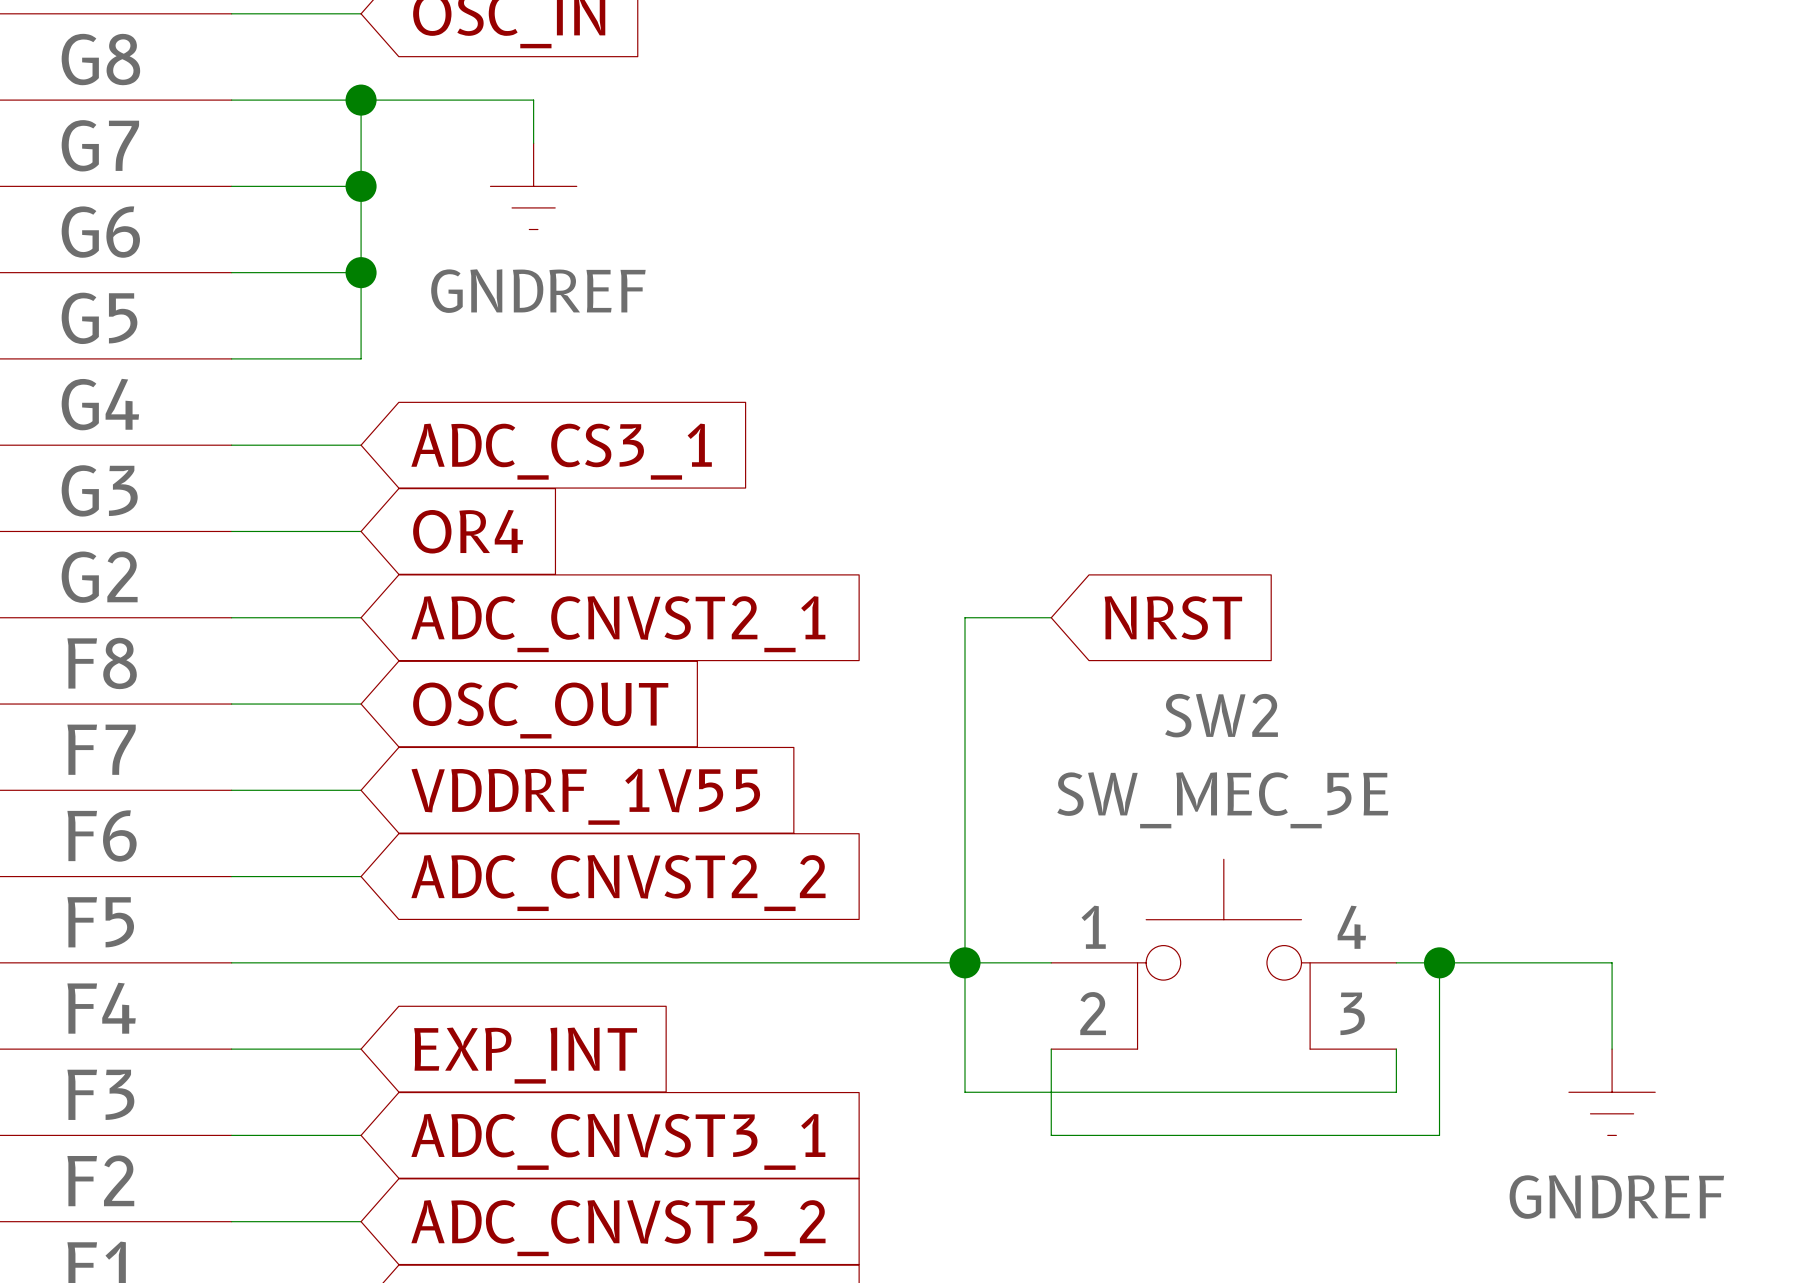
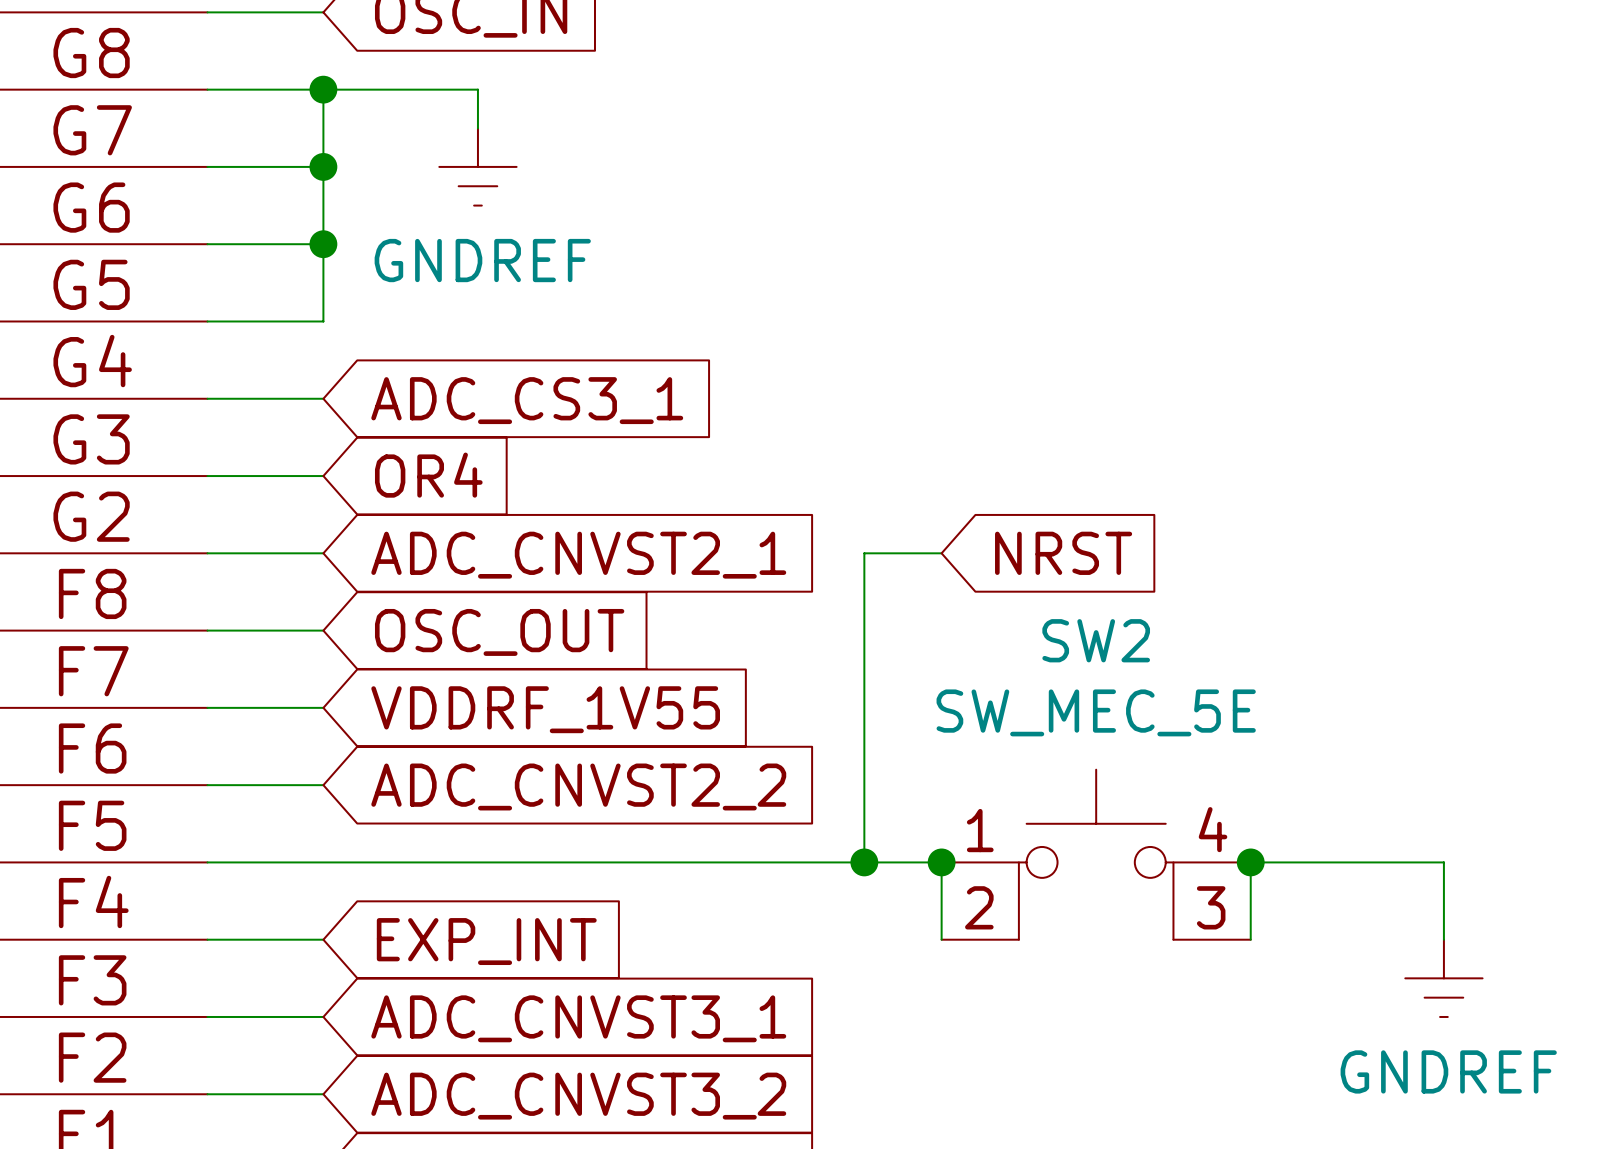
wire: (964, 962) (964, 1092) (1396, 1092) (1396, 1049) -> (1250, 862) (1250, 939)
junction: none -> (941, 862)
wire: (1439, 962) (1439, 1135) (1051, 1135) (1051, 1049) -> (941, 862) (941, 939)
junction position: (1439, 962) -> (1250, 862)

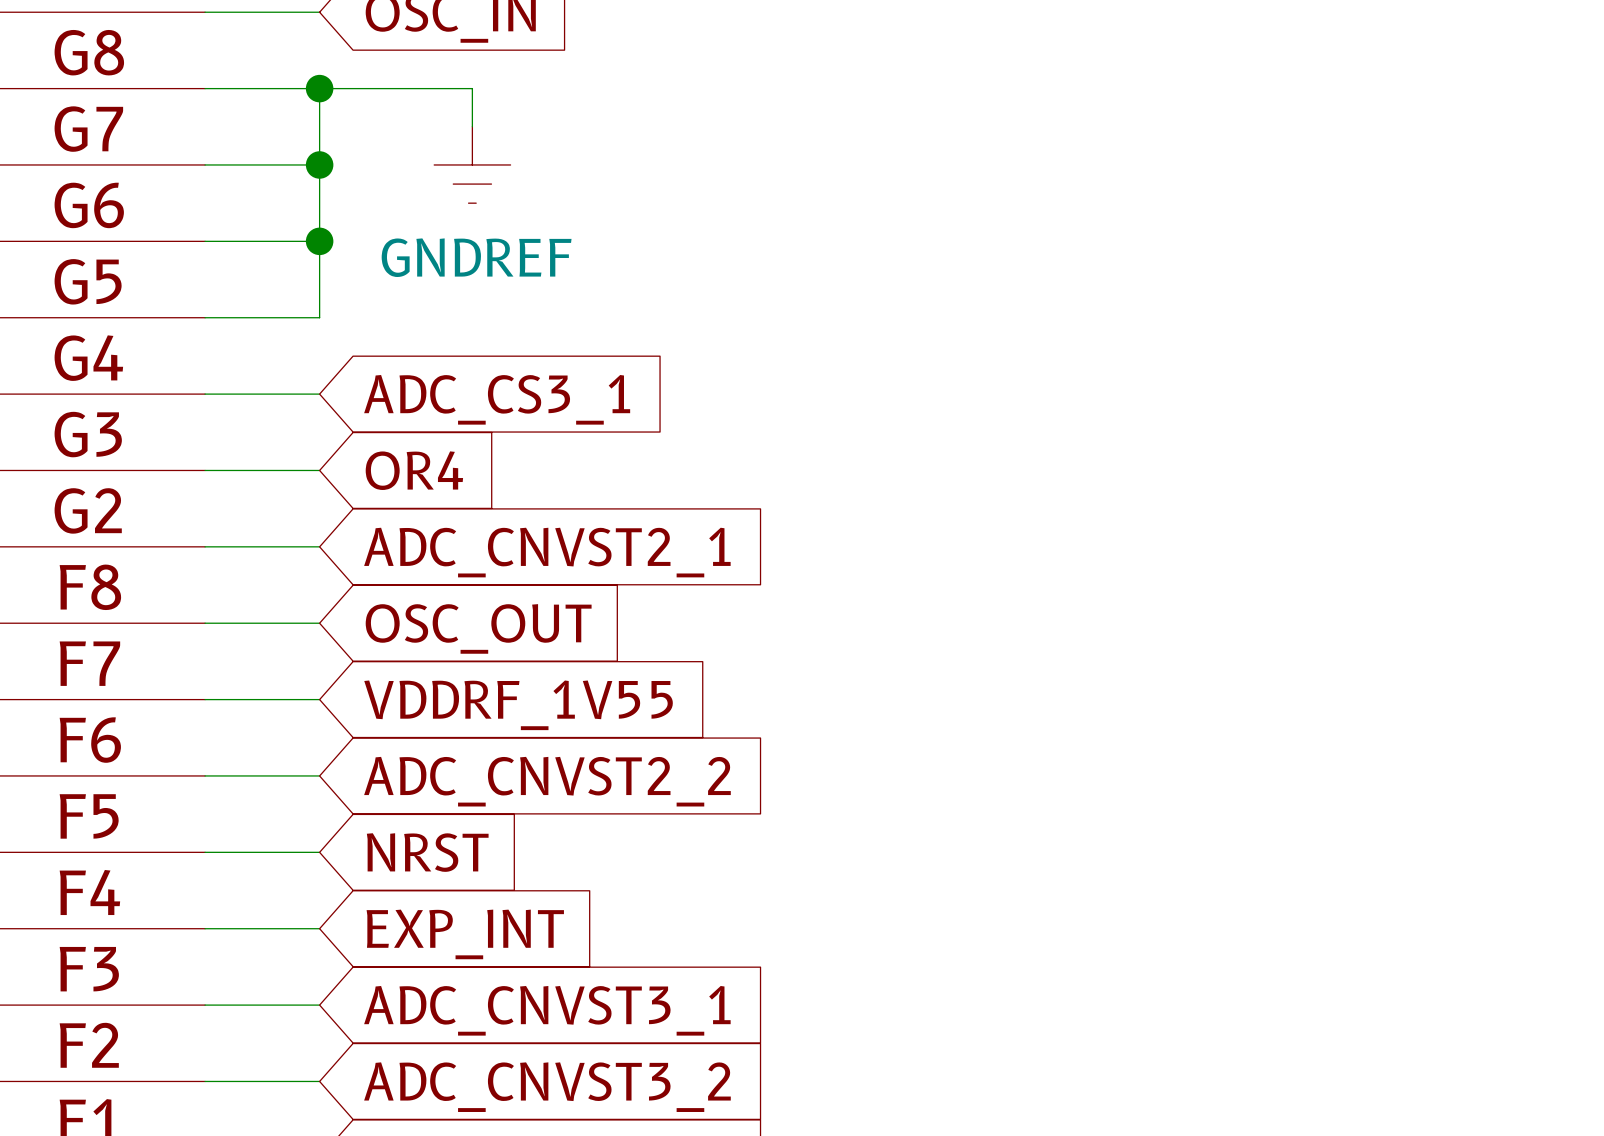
wire: (941, 553) (864, 553) (864, 862) -> none
global label position: NRST (1063, 553) -> NRST (427, 852)
SW2: SW_MEC_5E (1096, 854) -> none
wire: (323, 862) (941, 862) (941, 939) -> none
junction: (864, 862) -> none
junction: (941, 862) -> none
junction: (1250, 862) -> none
wire: (1250, 939) (1250, 862) (1443, 862) (1443, 939) -> none
power symbol: GNDREF (1443, 978) -> none

